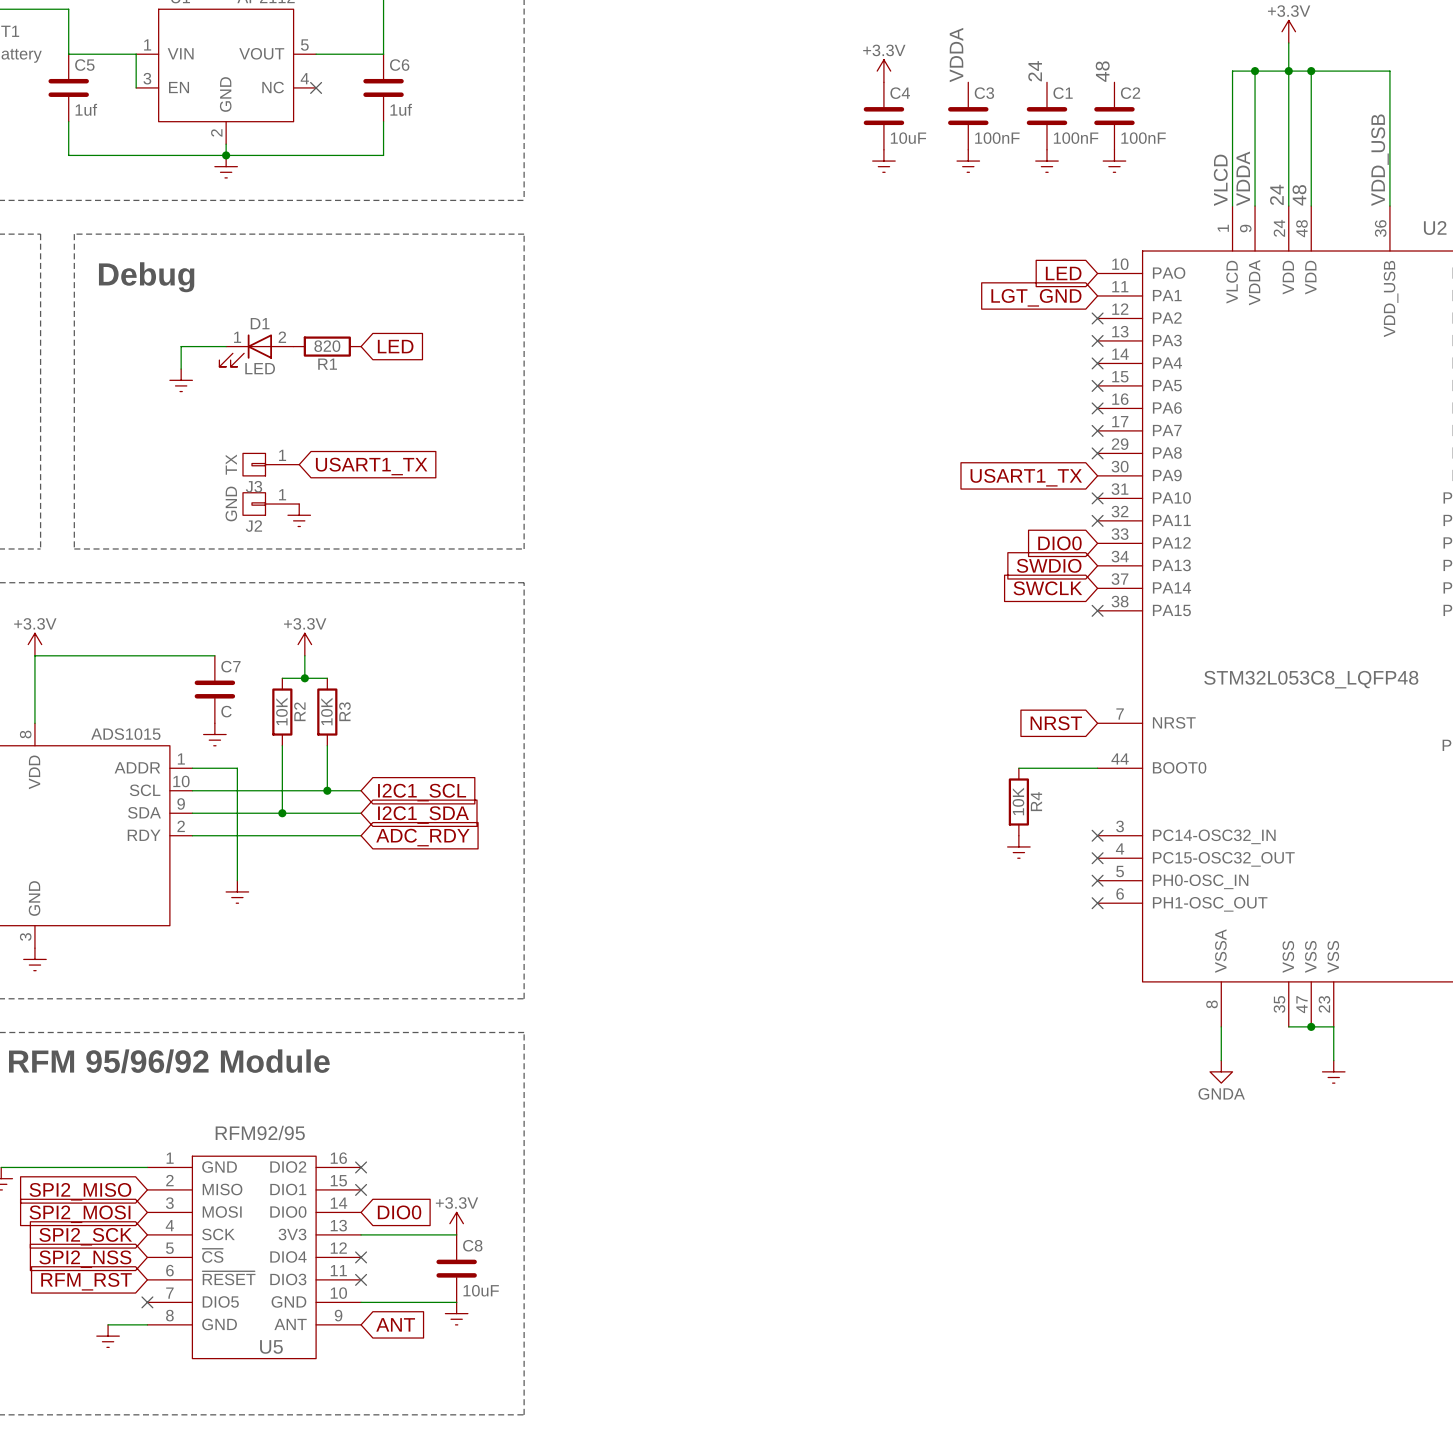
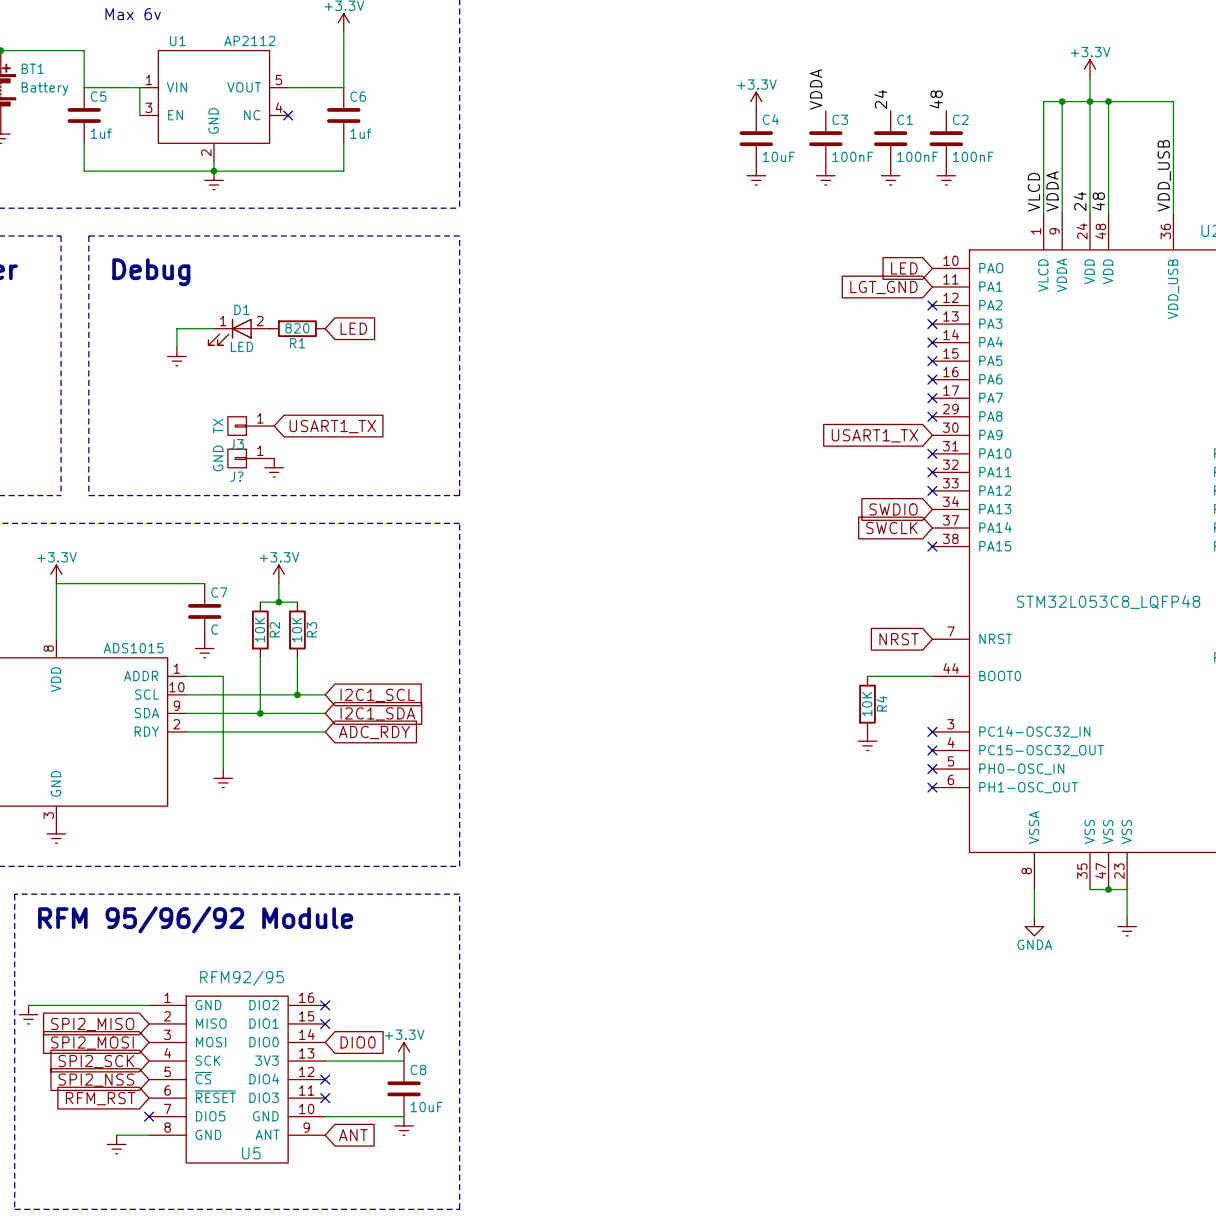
J2 name: J2 (253, 526) -> J? (236, 476)
global label: DIO0 (1059, 543) -> none
no-connect mark: none -> (932, 490)

